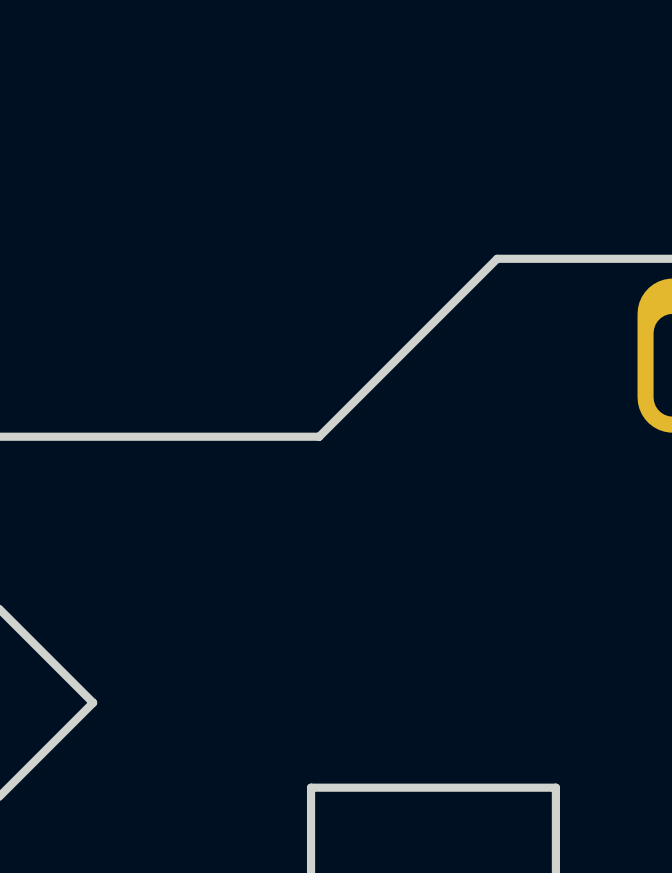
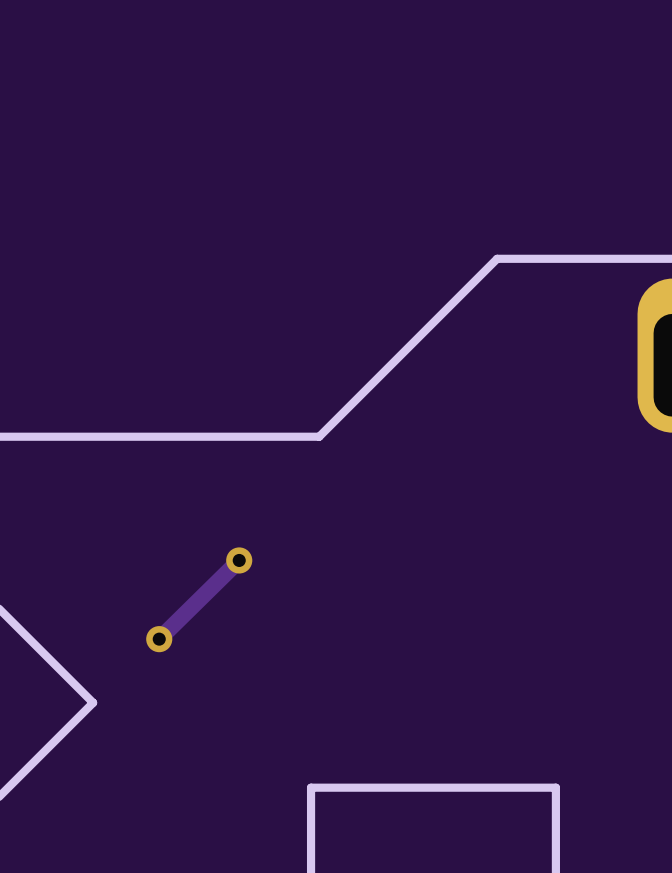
track: none -> (239, 560) (159, 639)
via: none -> (239, 560)
via: none -> (159, 639)

